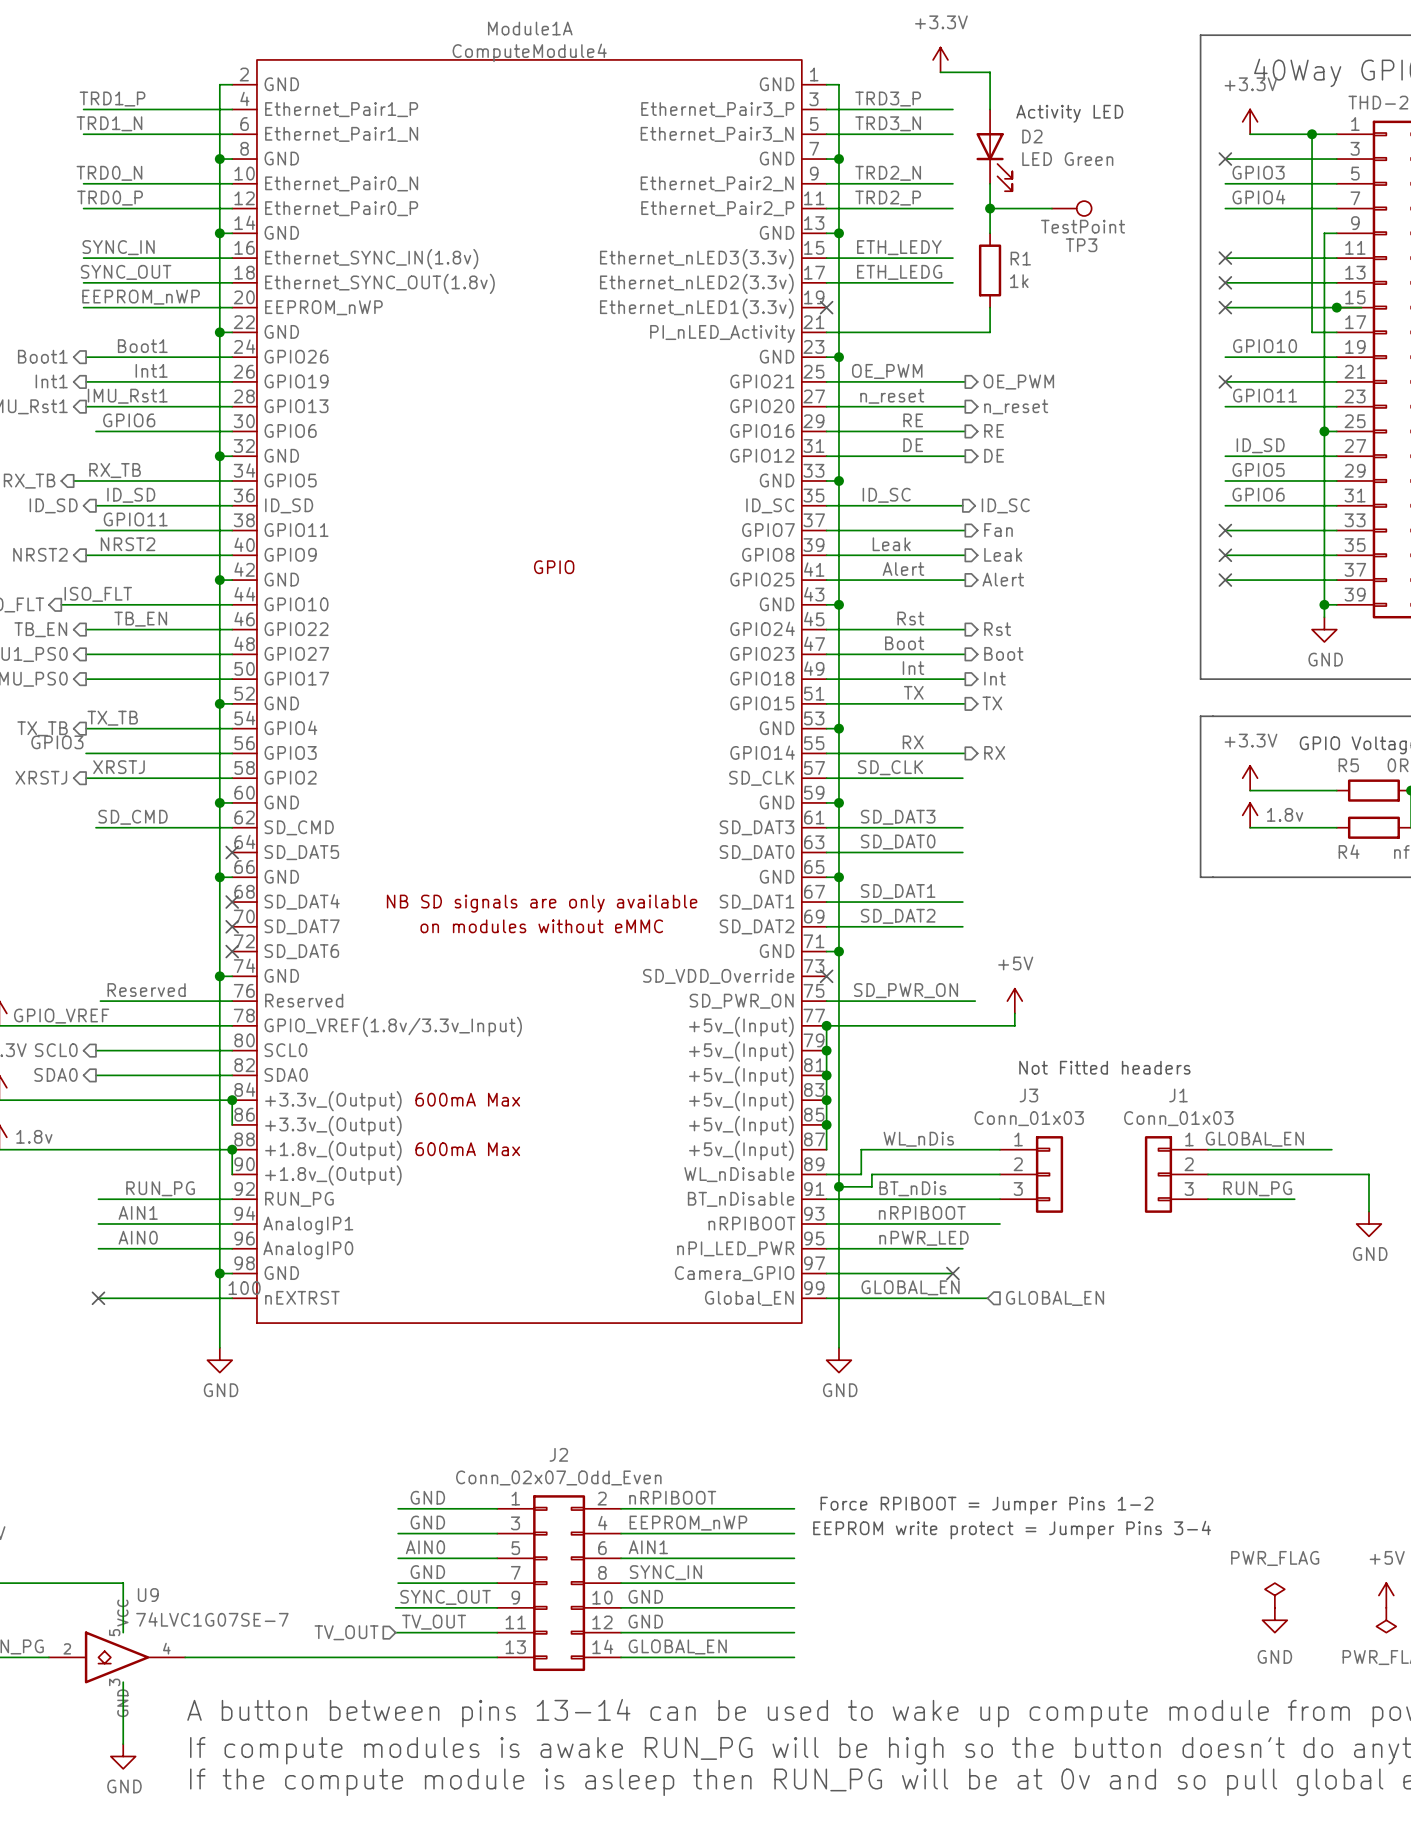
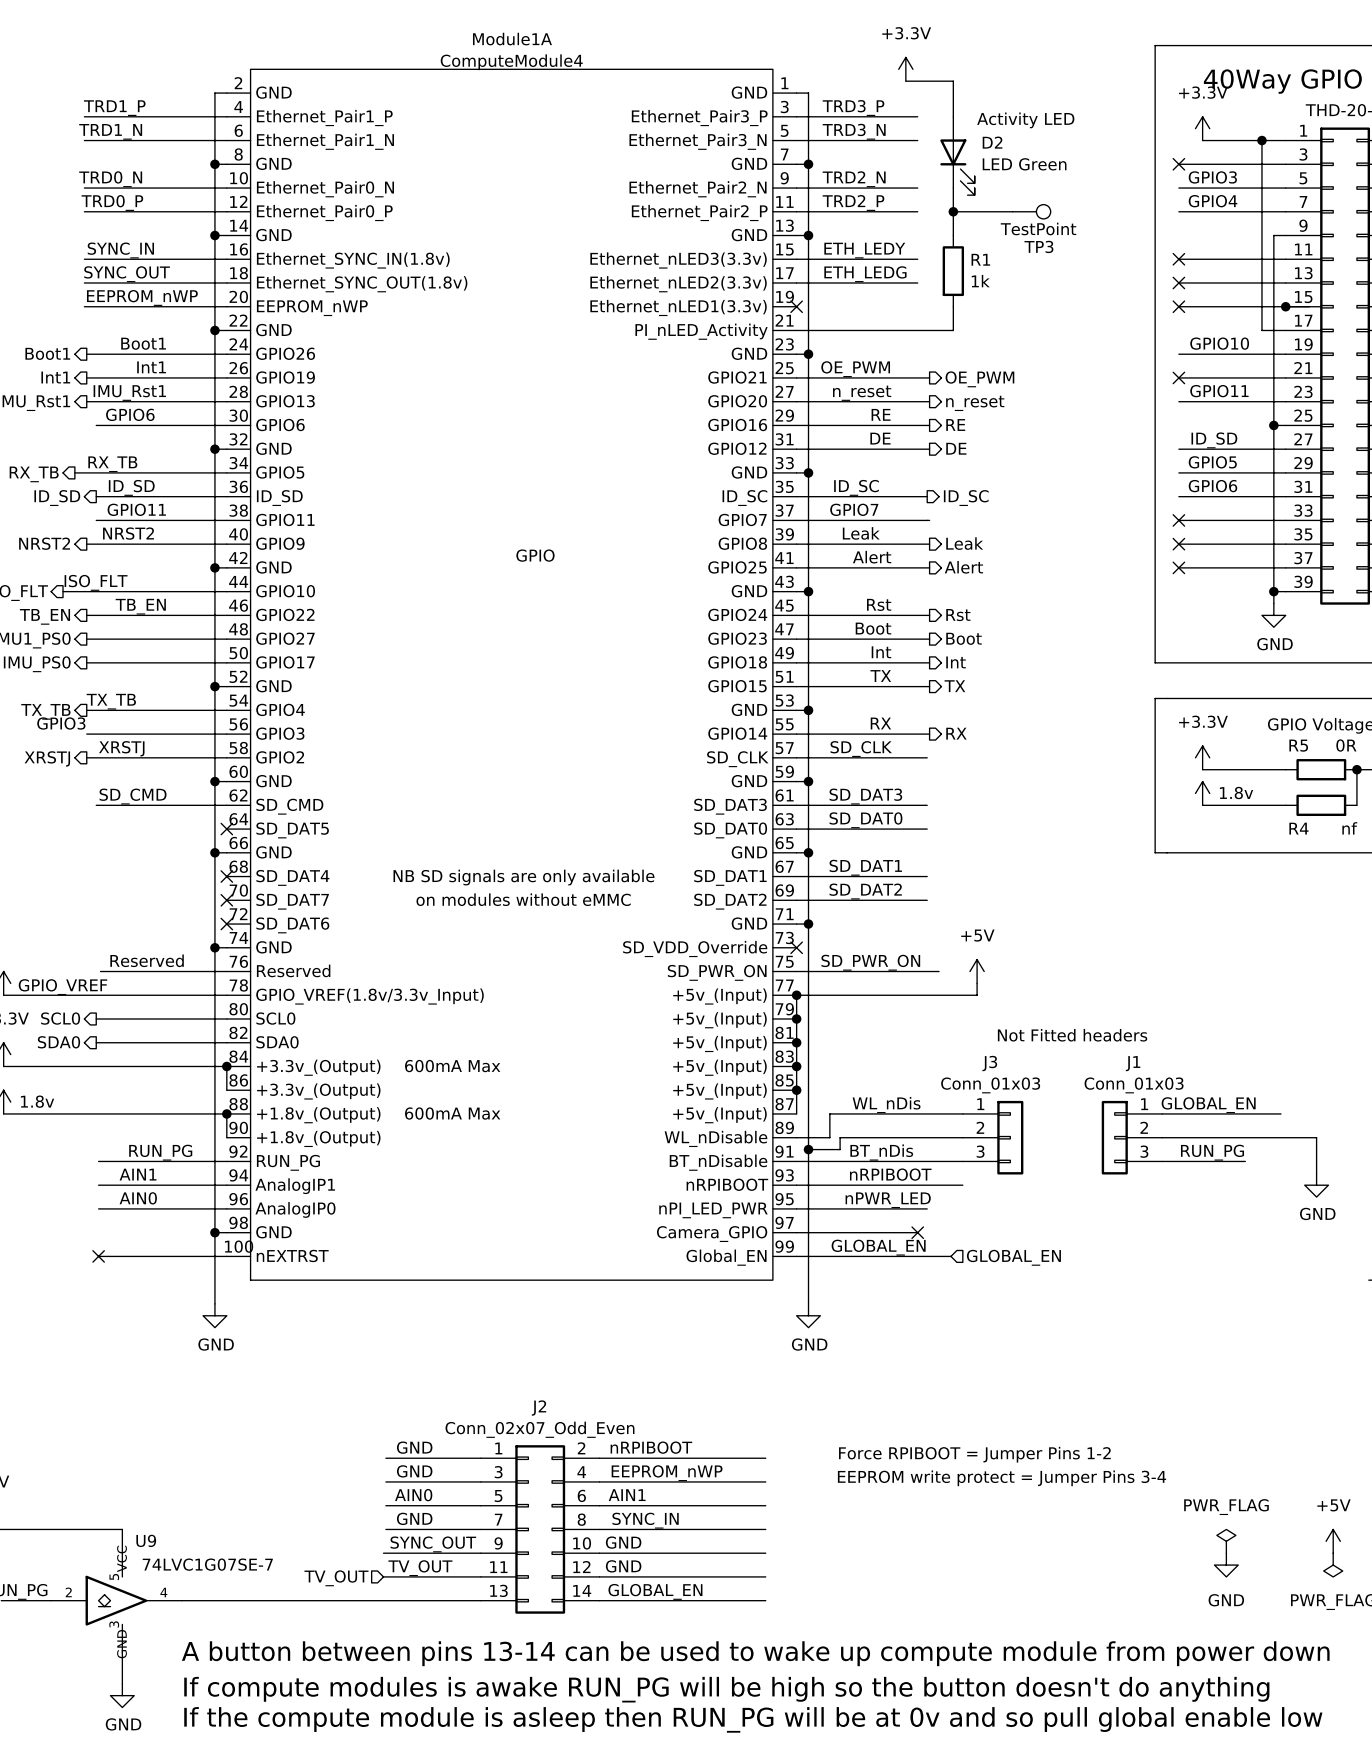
label: none -> GPIO7 (854, 509)
hierarchical label: Fan (998, 530) -> none

